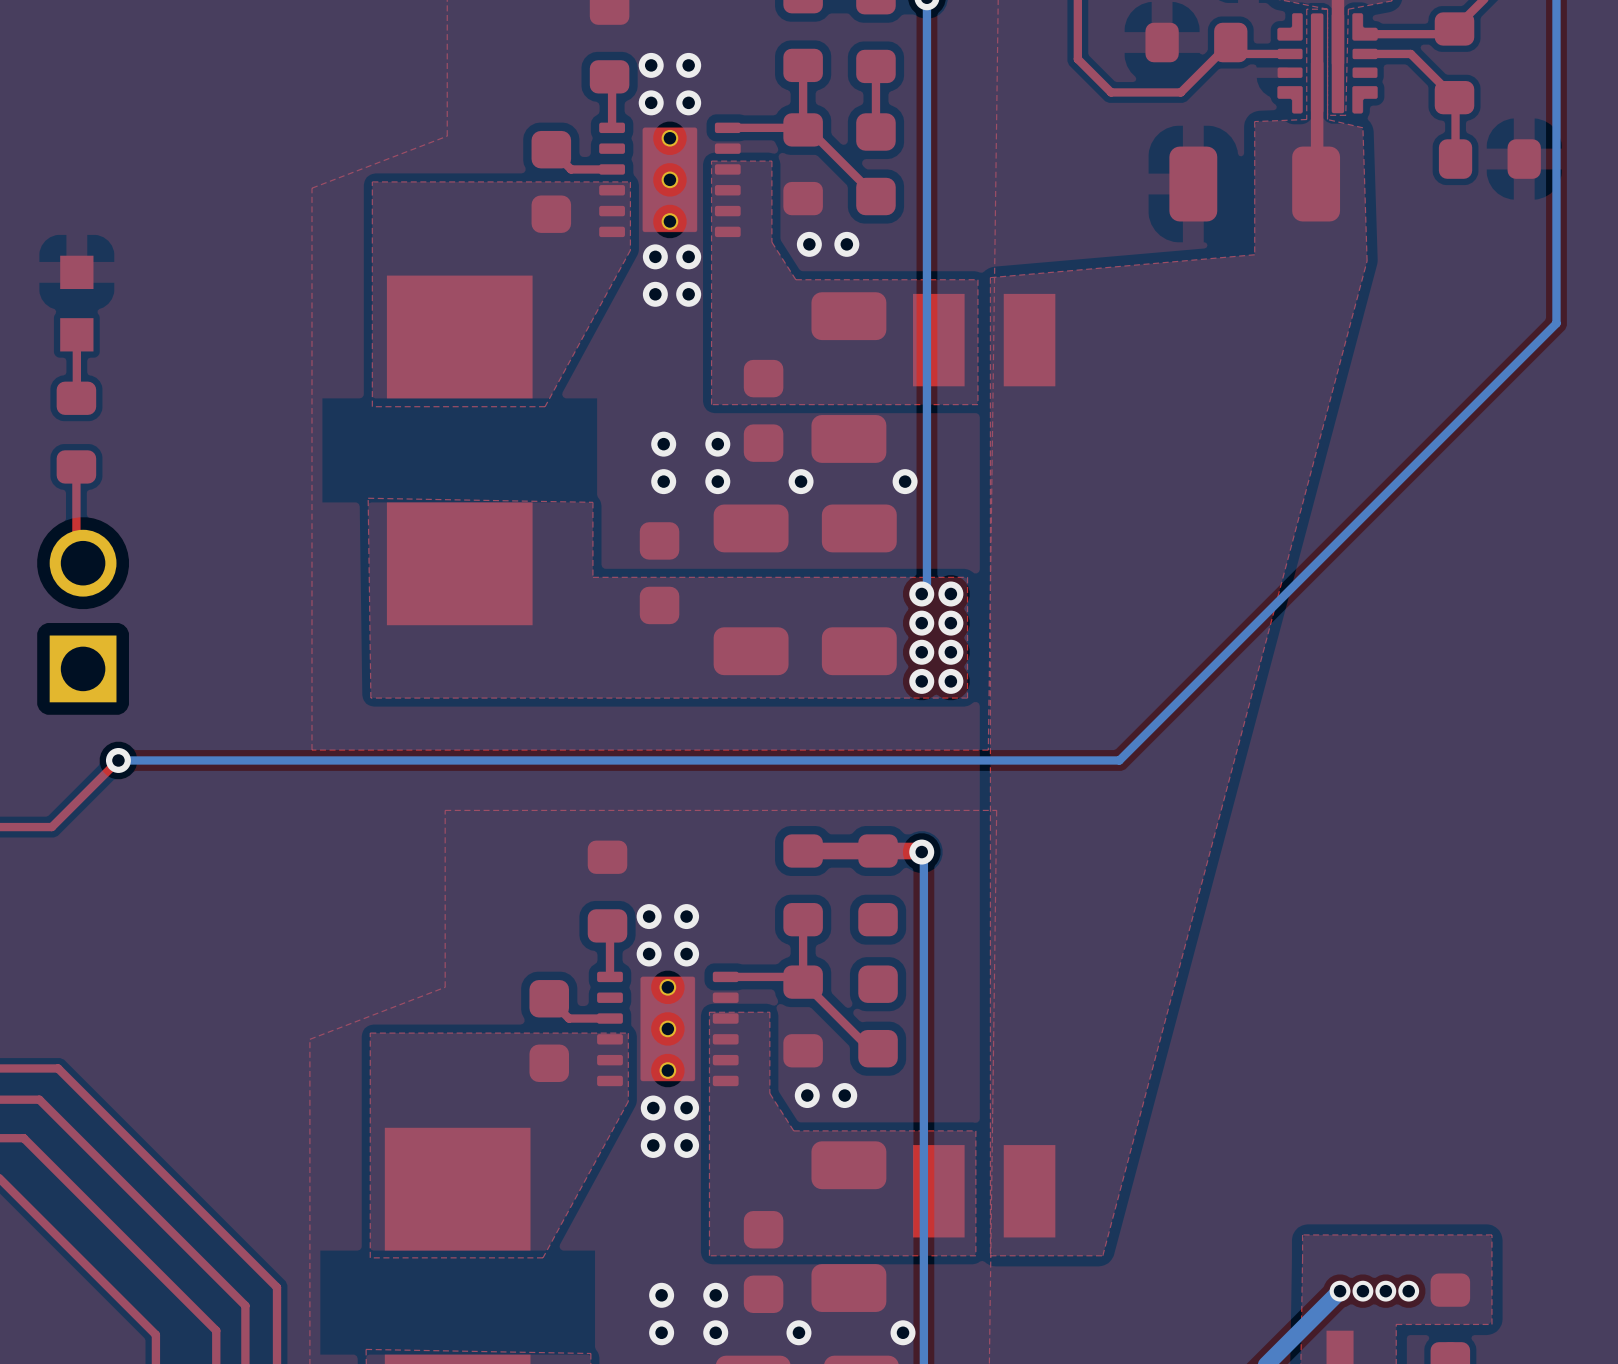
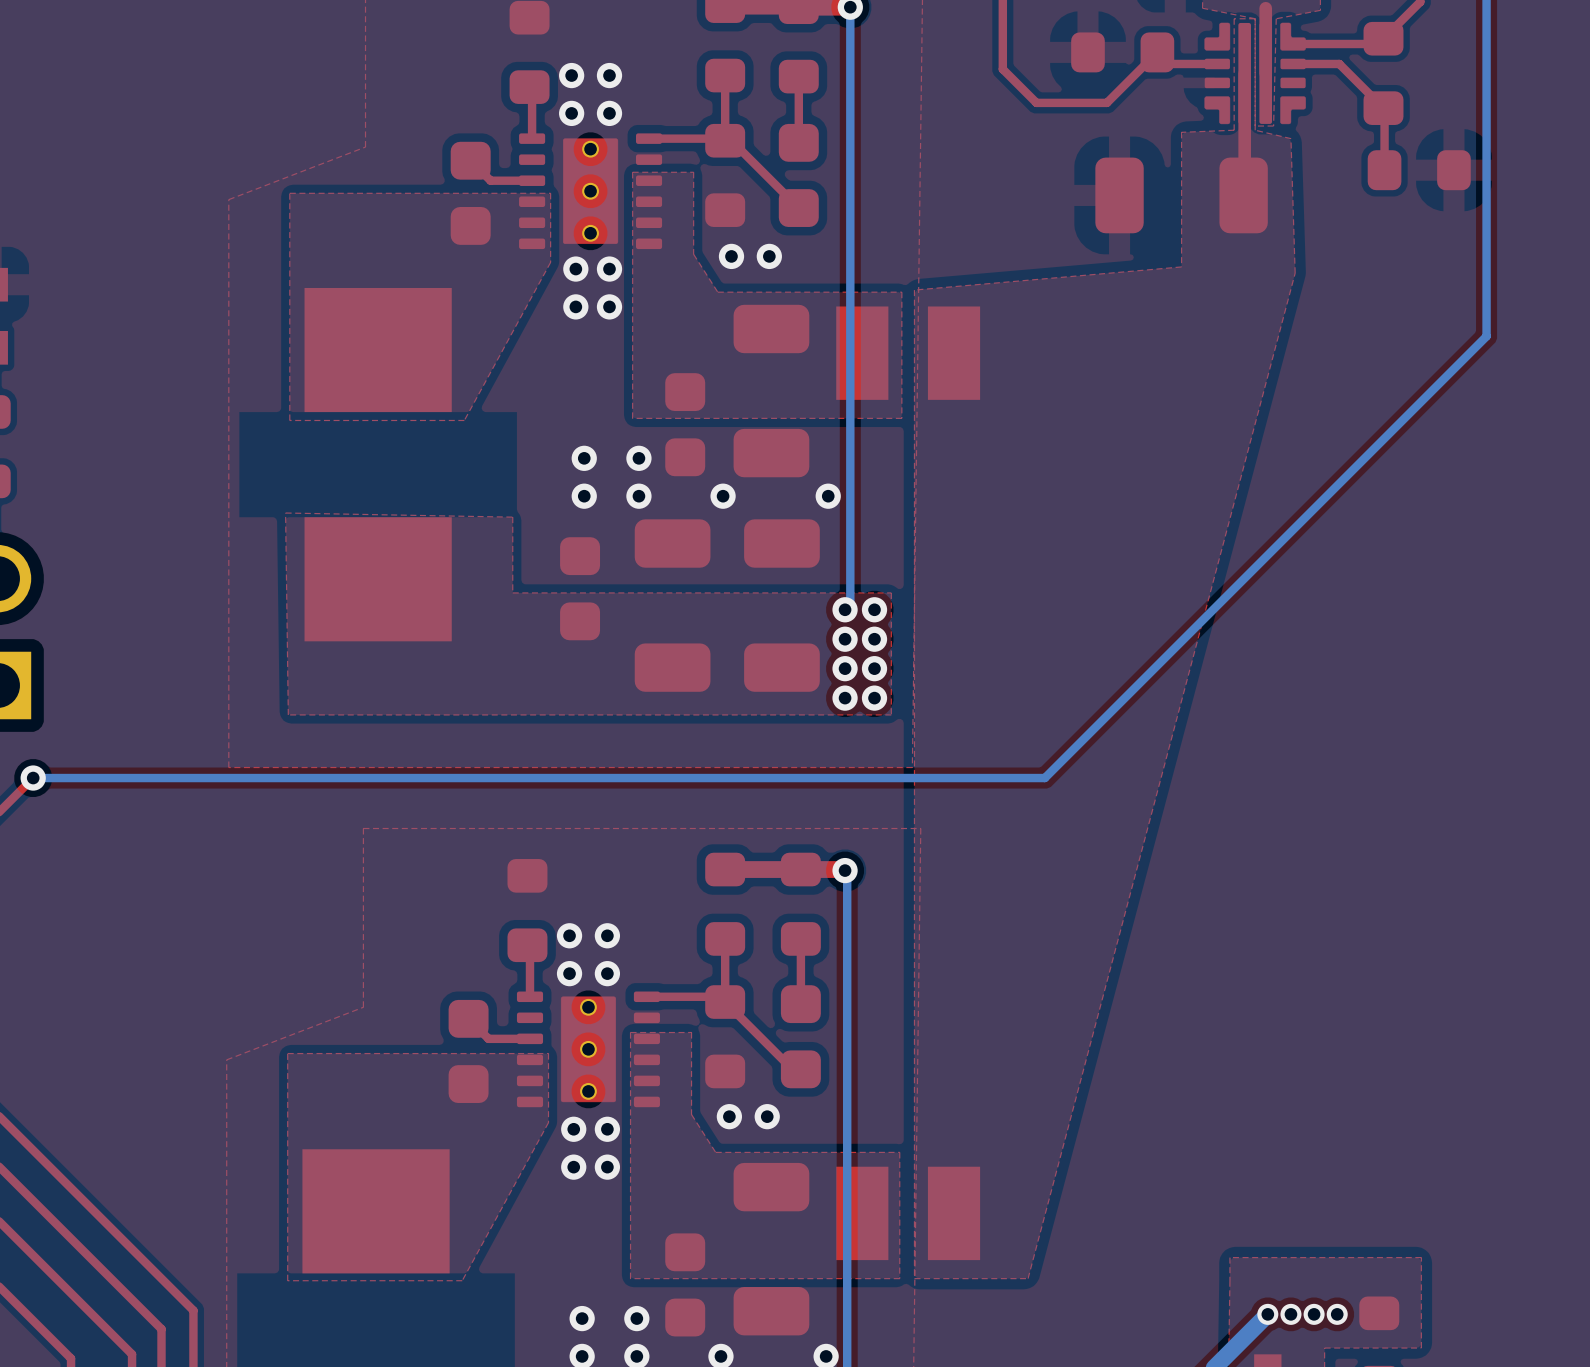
top track: none -> (800, 938) (800, 1004)

